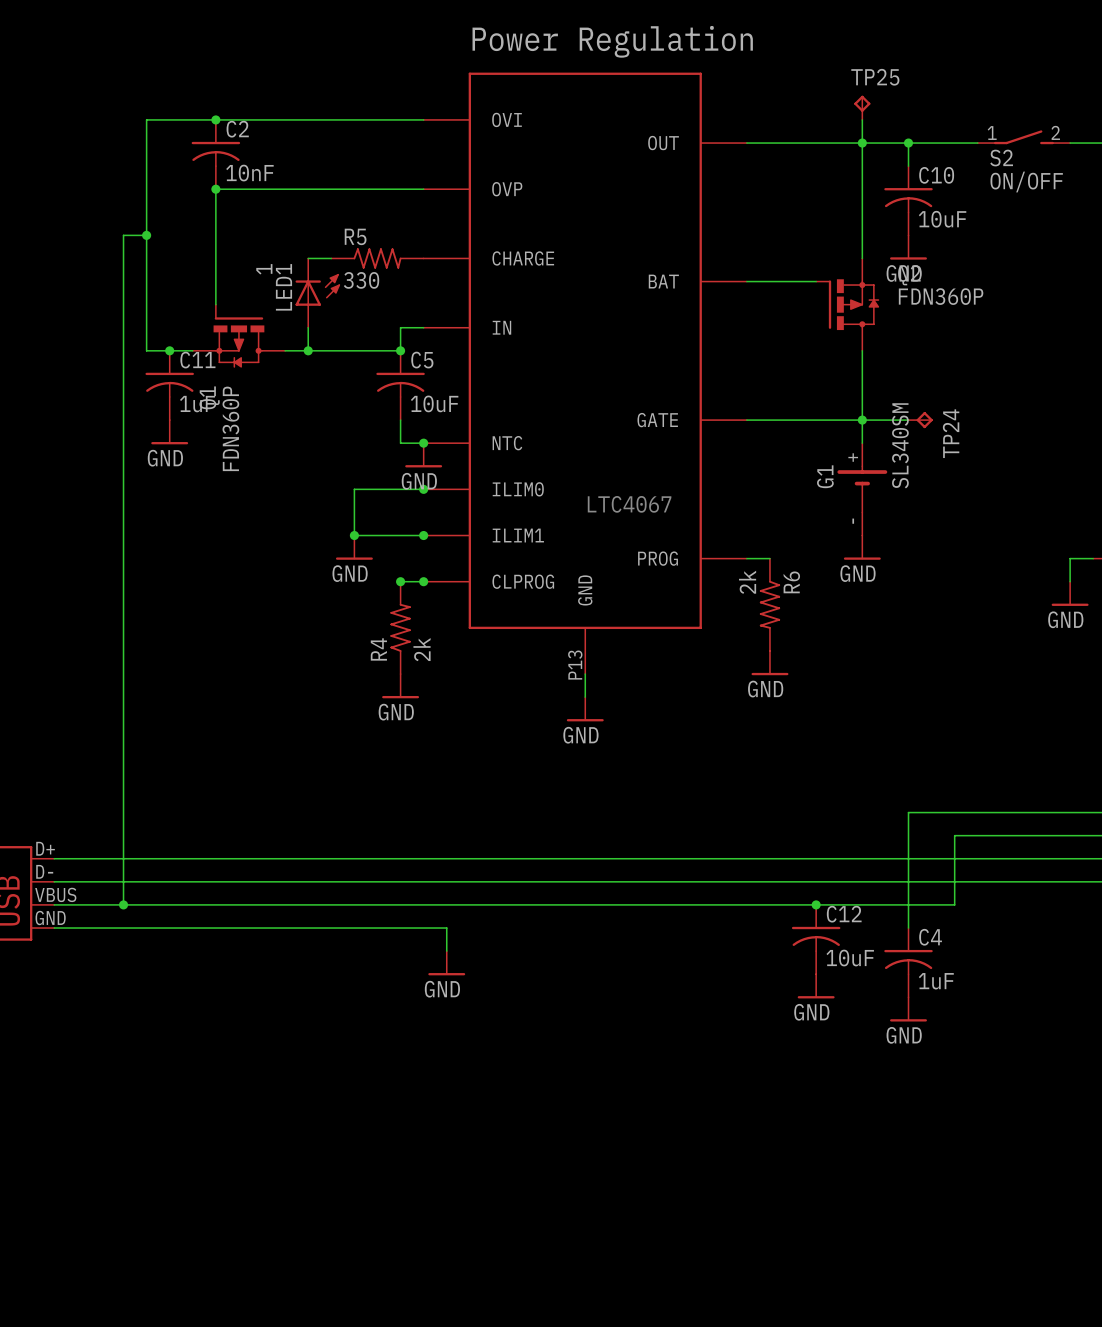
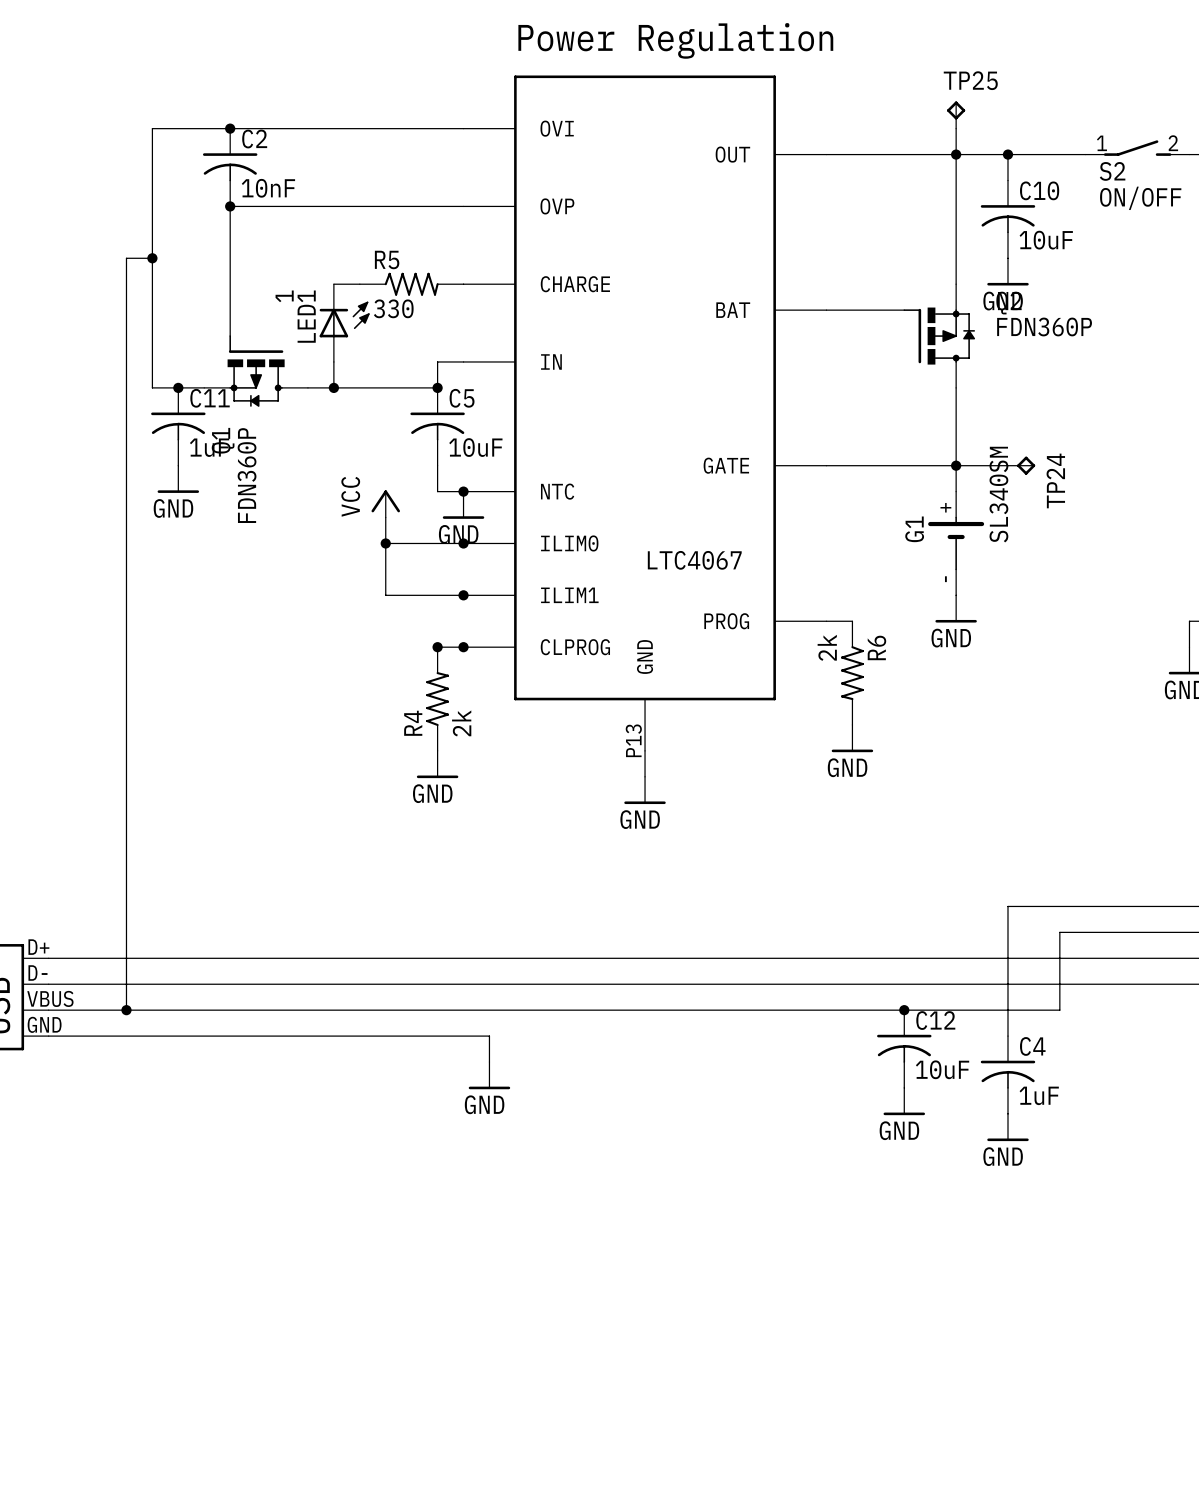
power symbol: none -> VCC (385, 503)
wire: none -> (385, 517) (385, 543)
junction position: (354, 535) -> (385, 543)
power symbol: GND (354, 547) -> none

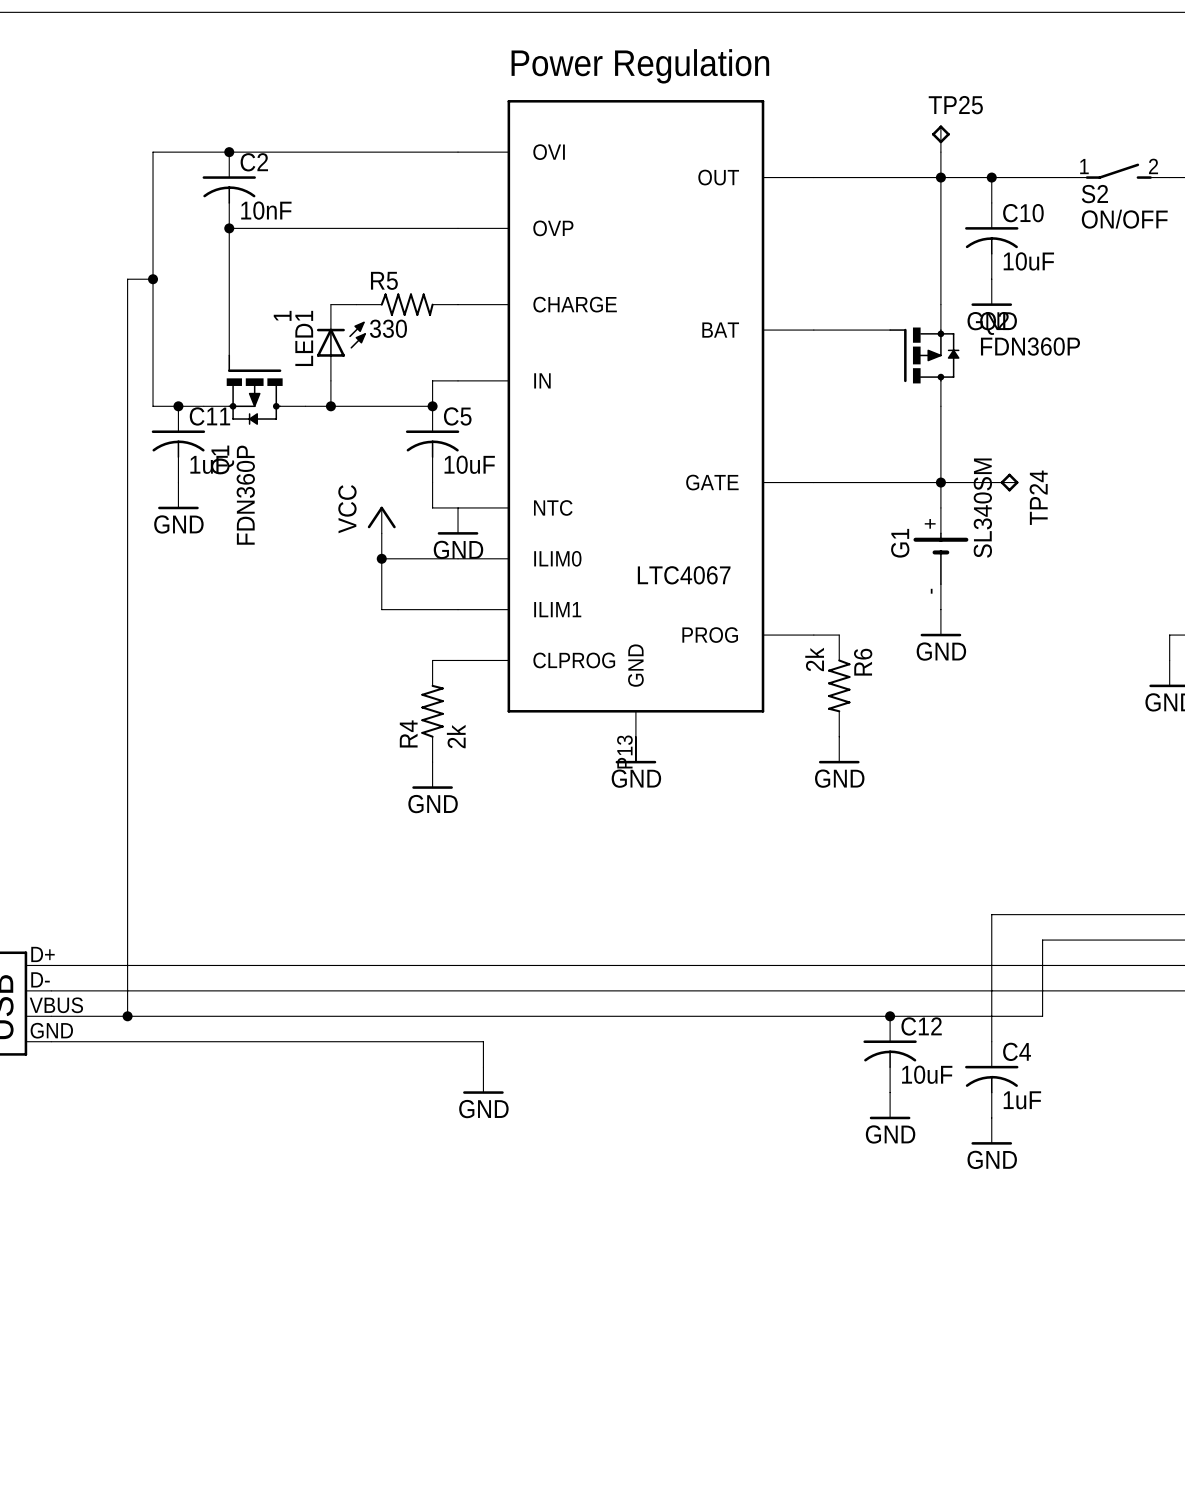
junction: (463, 491) -> none
junction: (463, 543) -> none
junction: (463, 595) -> none
junction: (437, 647) -> none
junction: (463, 647) -> none
wire: (645, 750) (645, 776) -> none
power symbol position: GND (645, 790) -> GND (635, 750)

